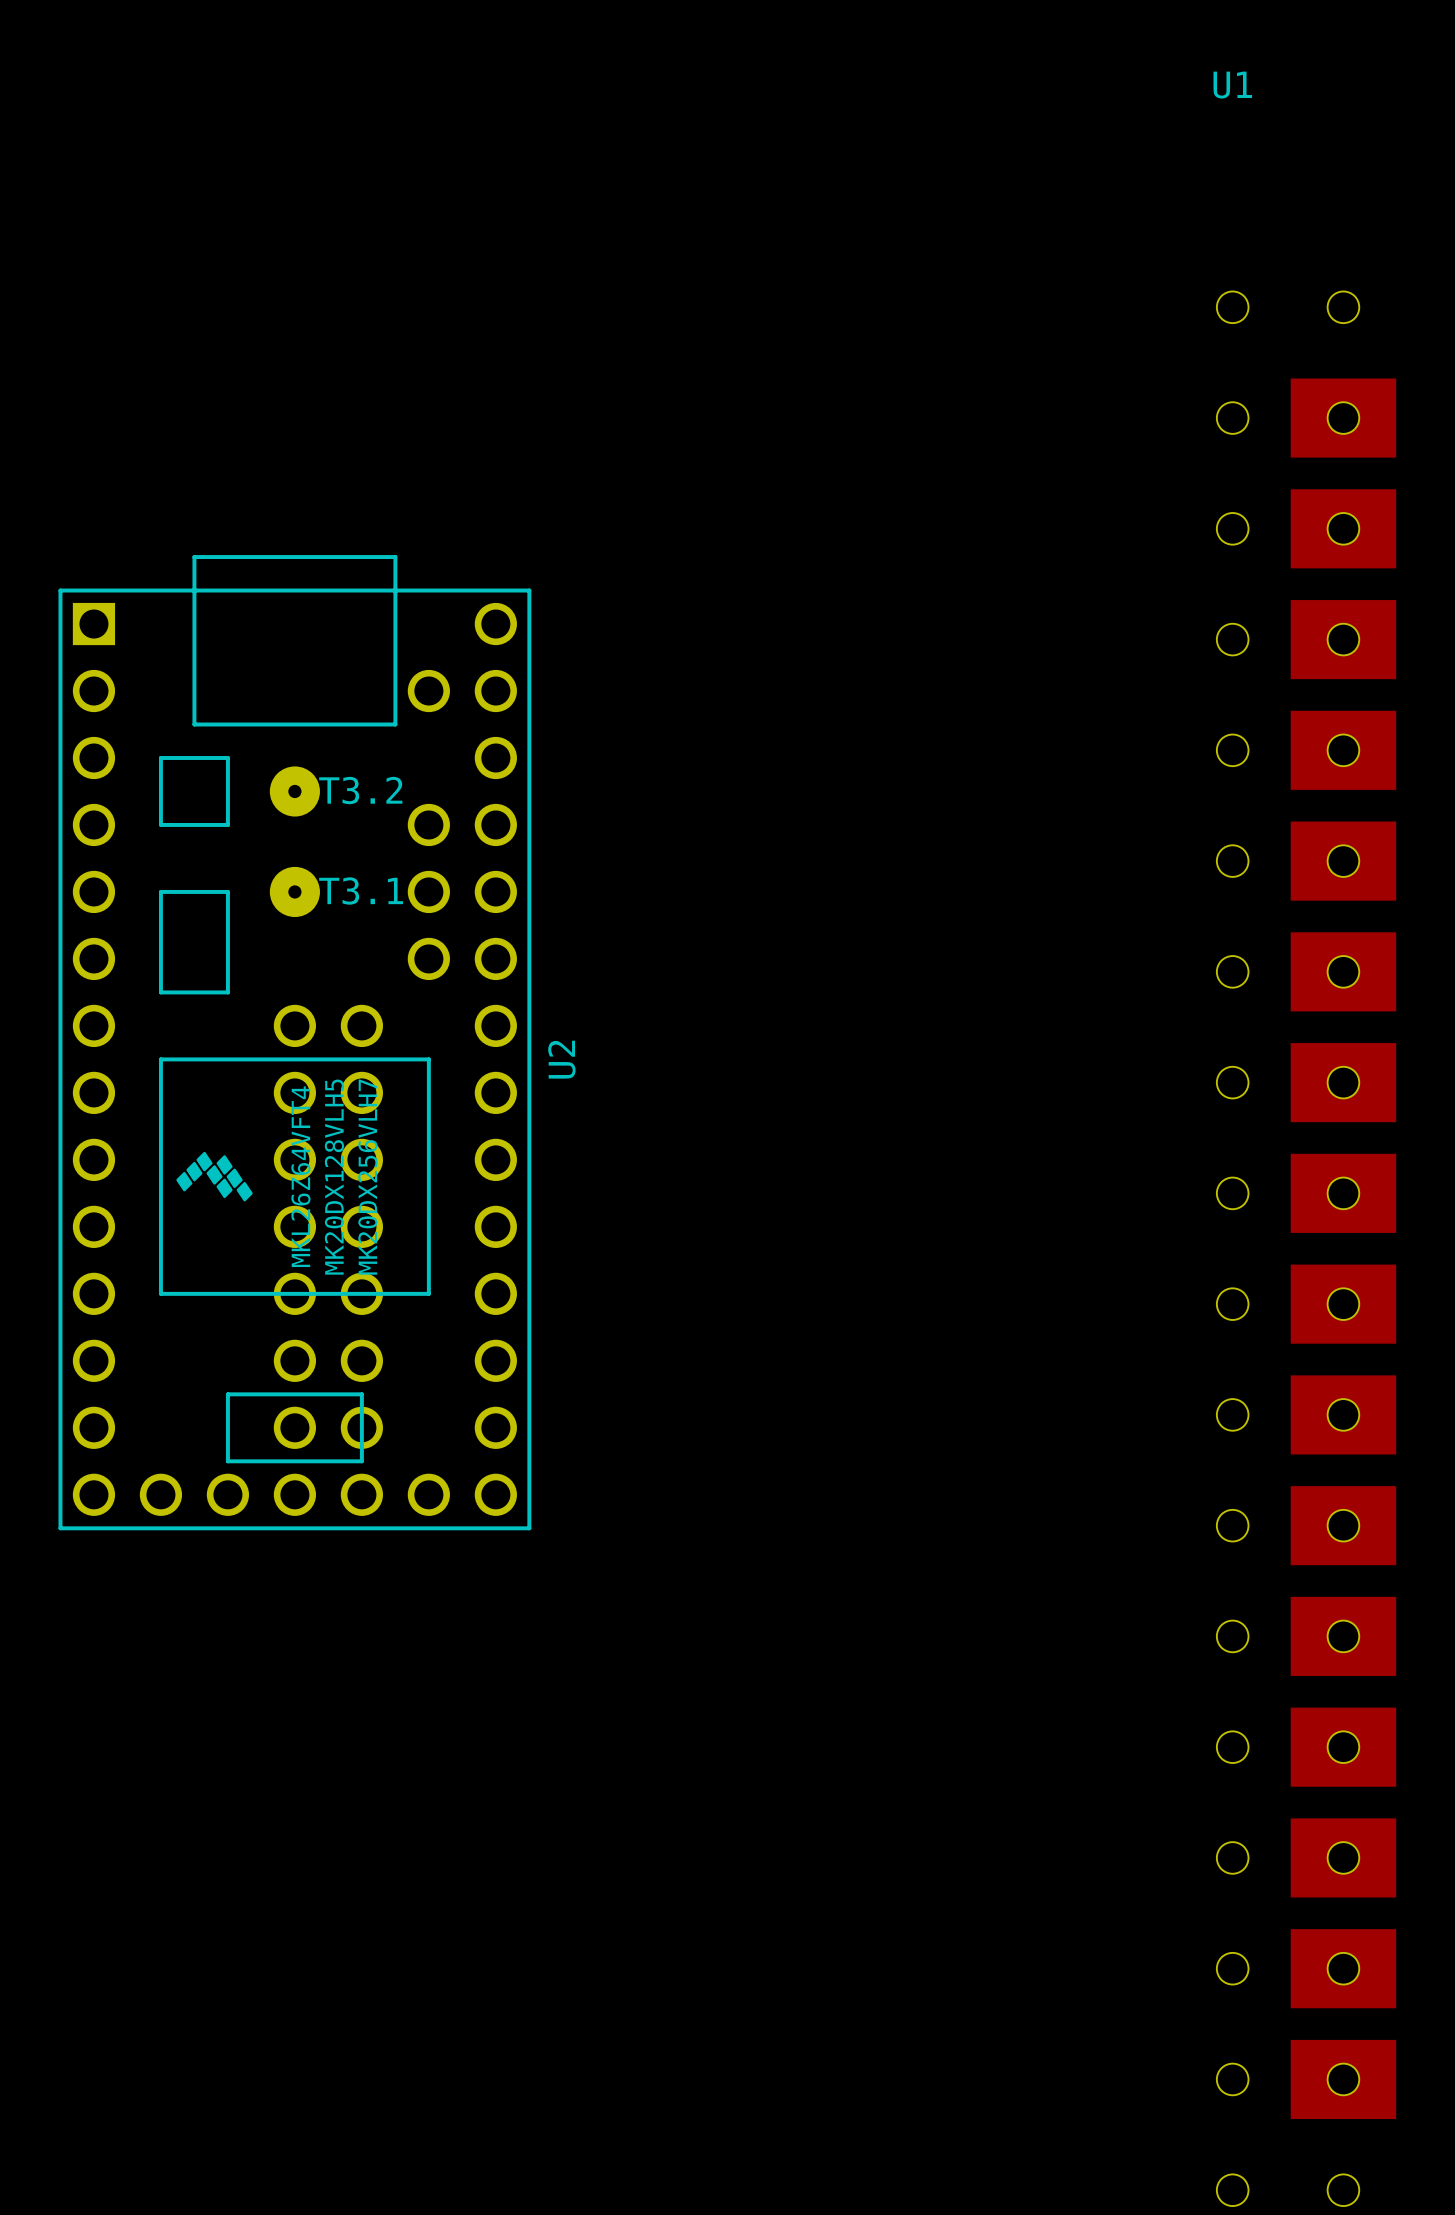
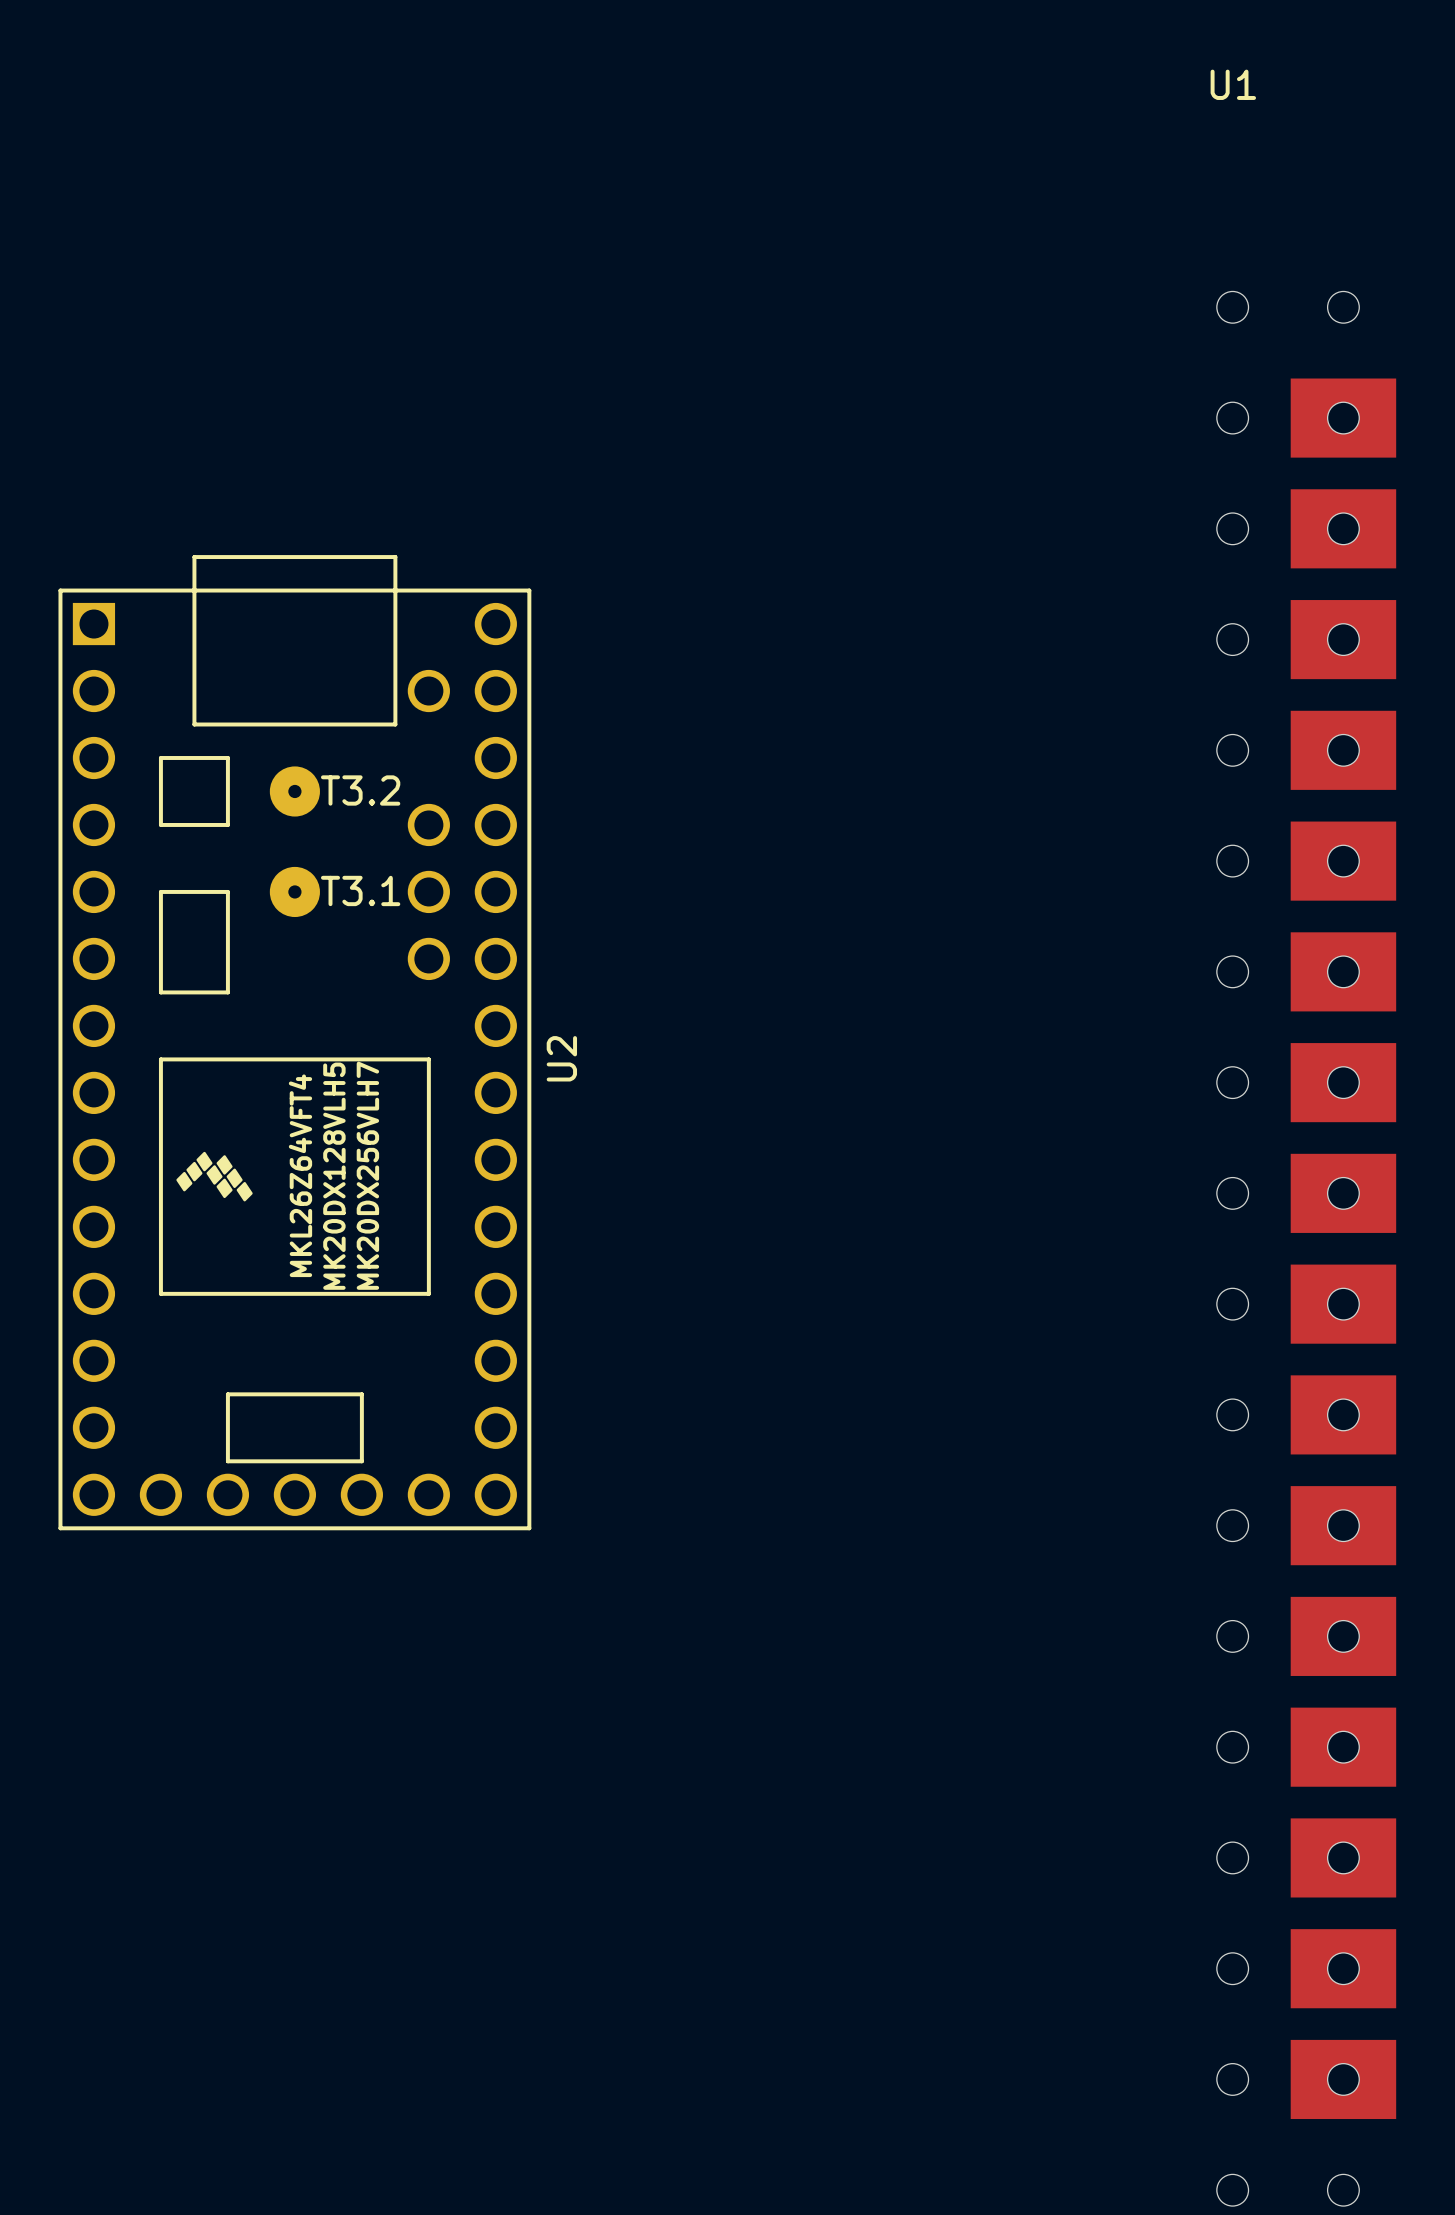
U2 footprint: [58, 555, 532, 1531] -> [58, 555, 532, 1531]

